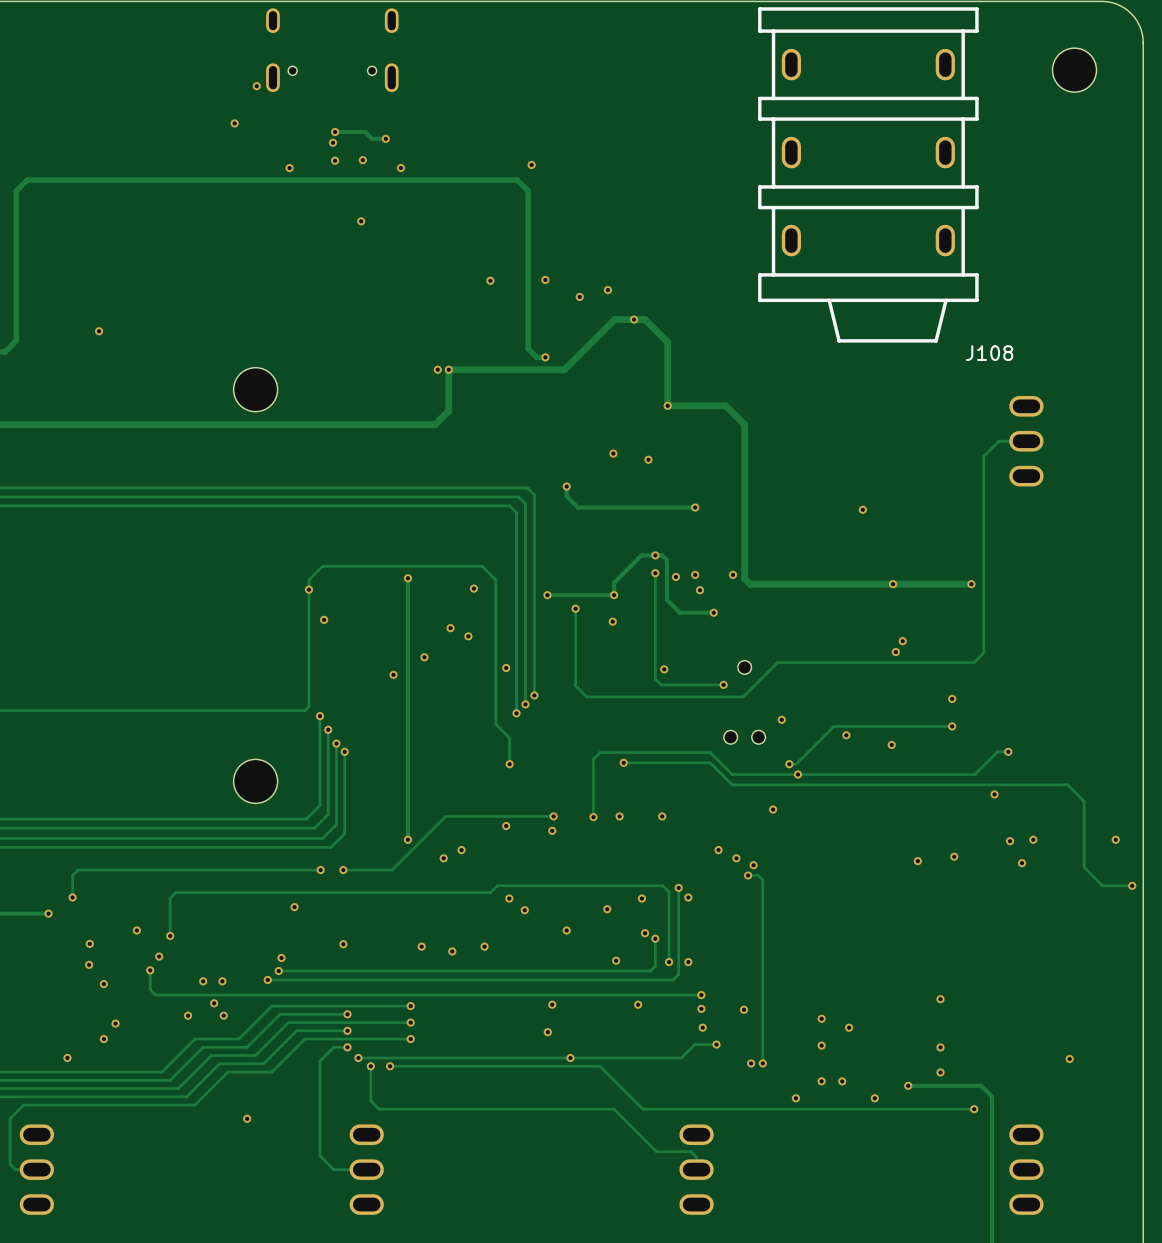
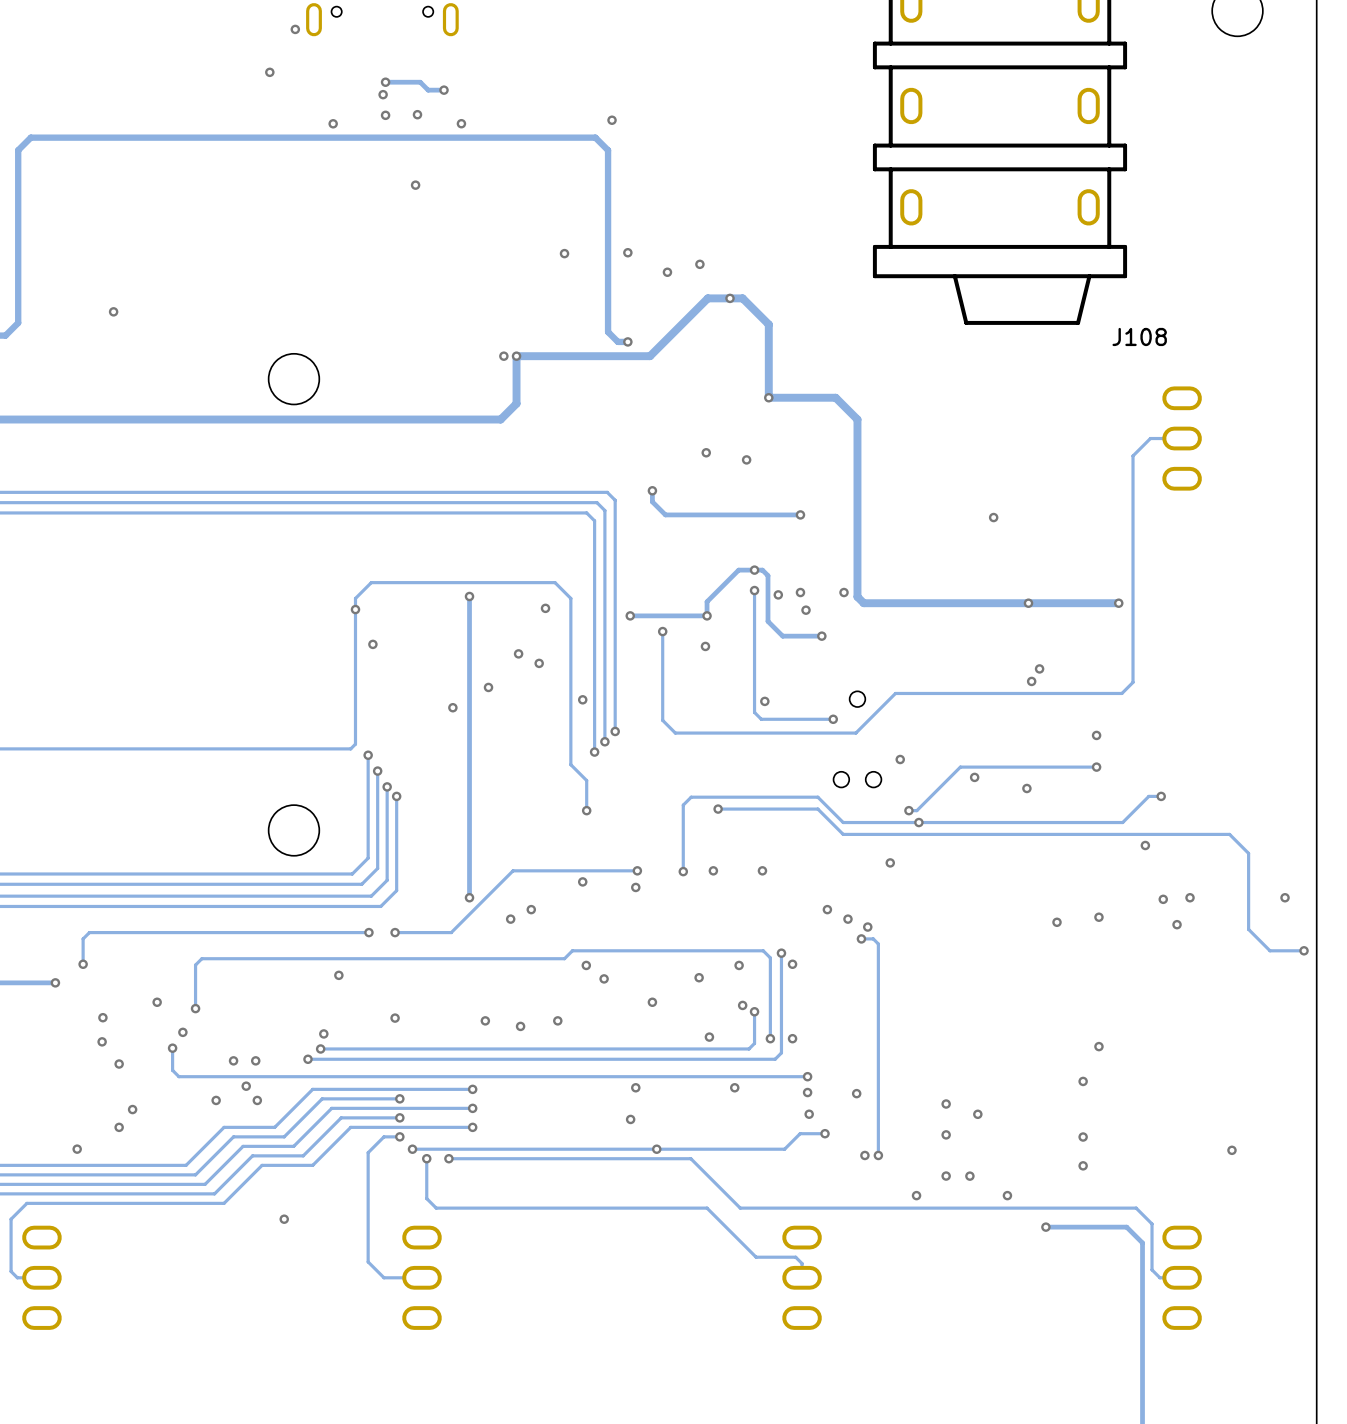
via: none -> (1098, 1046)
track: (908, 1085) (981, 1085) (992, 1096) (992, 1139) -> (1045, 1227) (1126, 1227) (1142, 1242)
via: (908, 1085) -> none
track: none -> (1121, 1208) (1136, 1208) (1152, 1223) (1152, 1269) (1159, 1277) (1182, 1277)
via: (974, 1109) -> none
via: none -> (1045, 1227)

